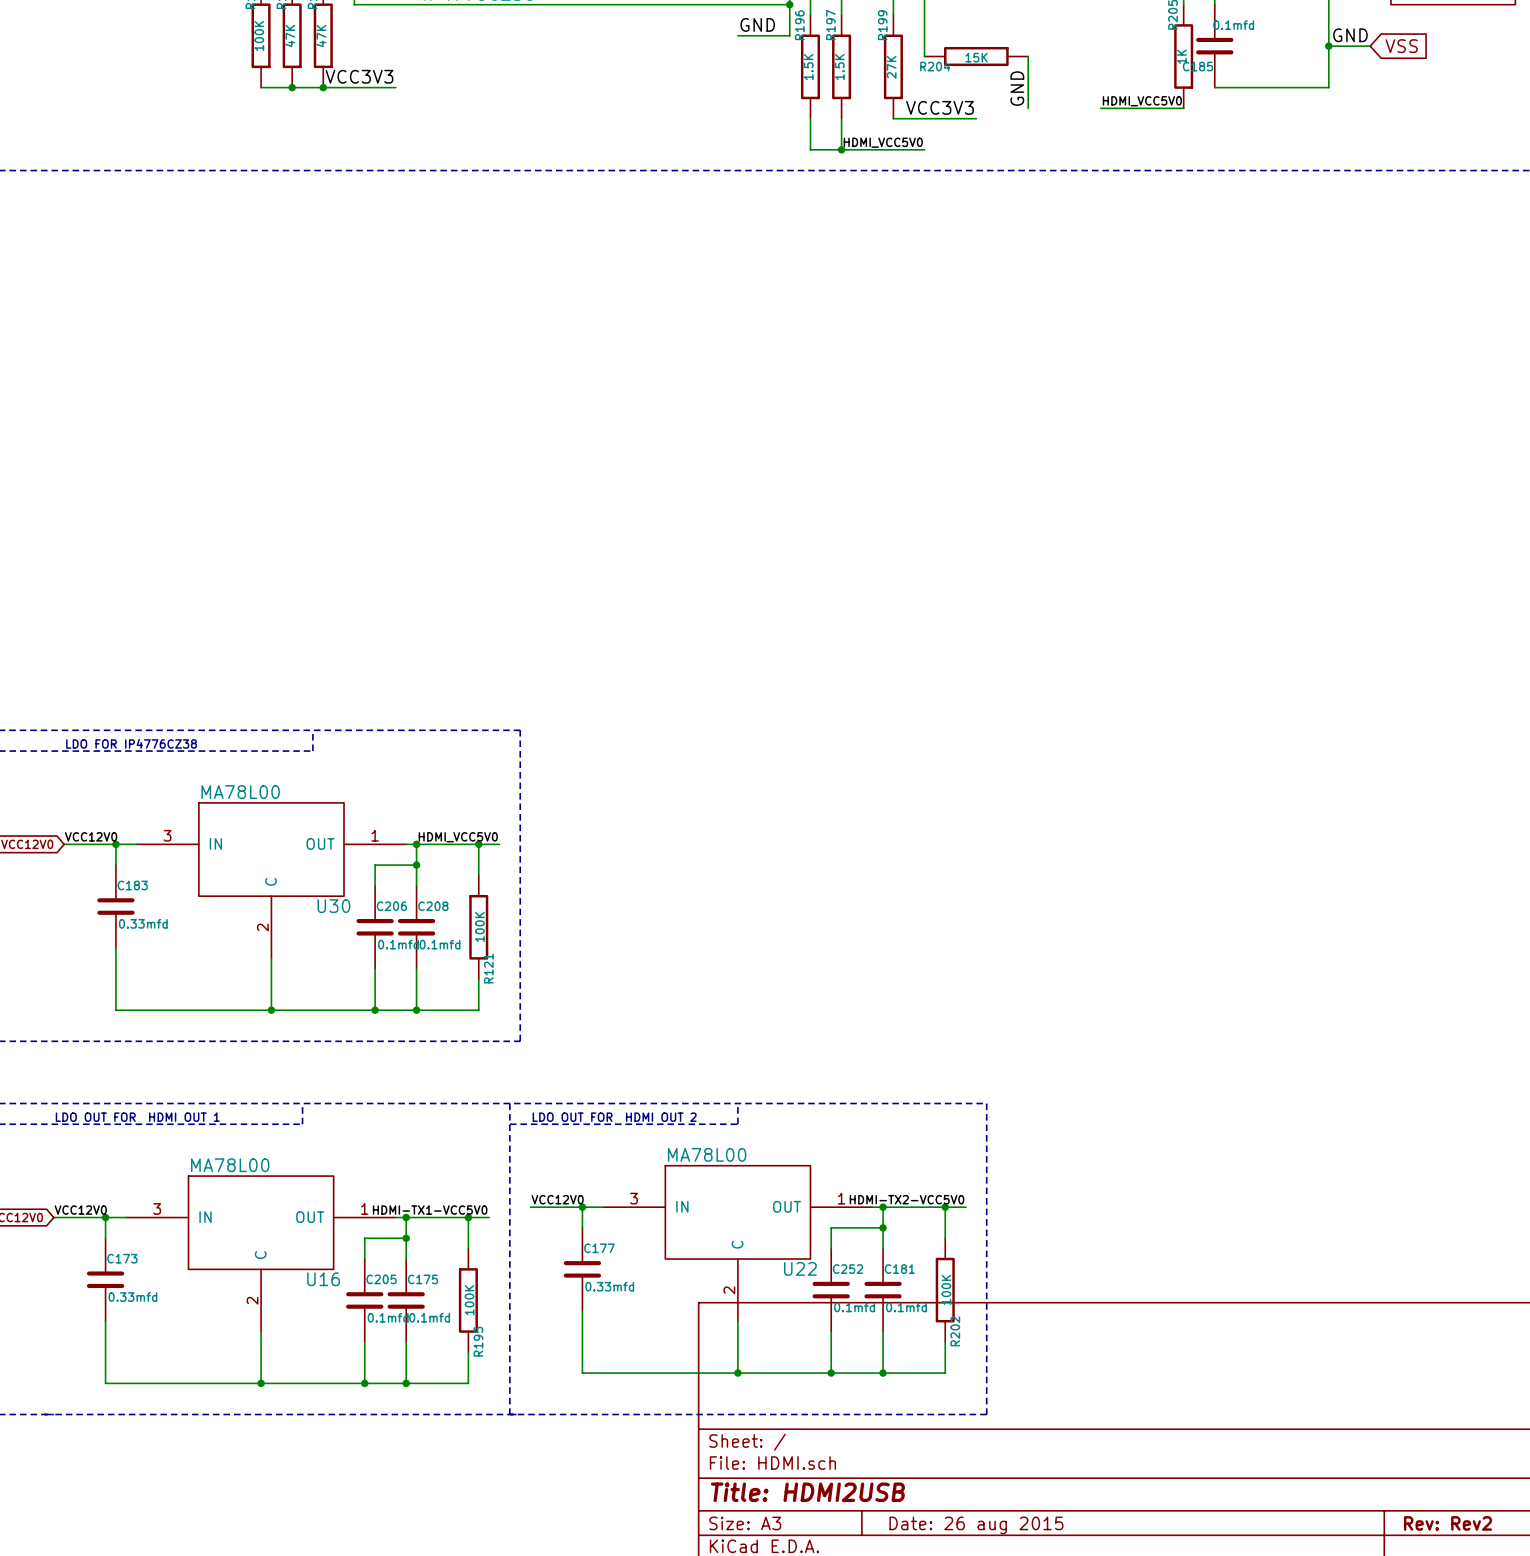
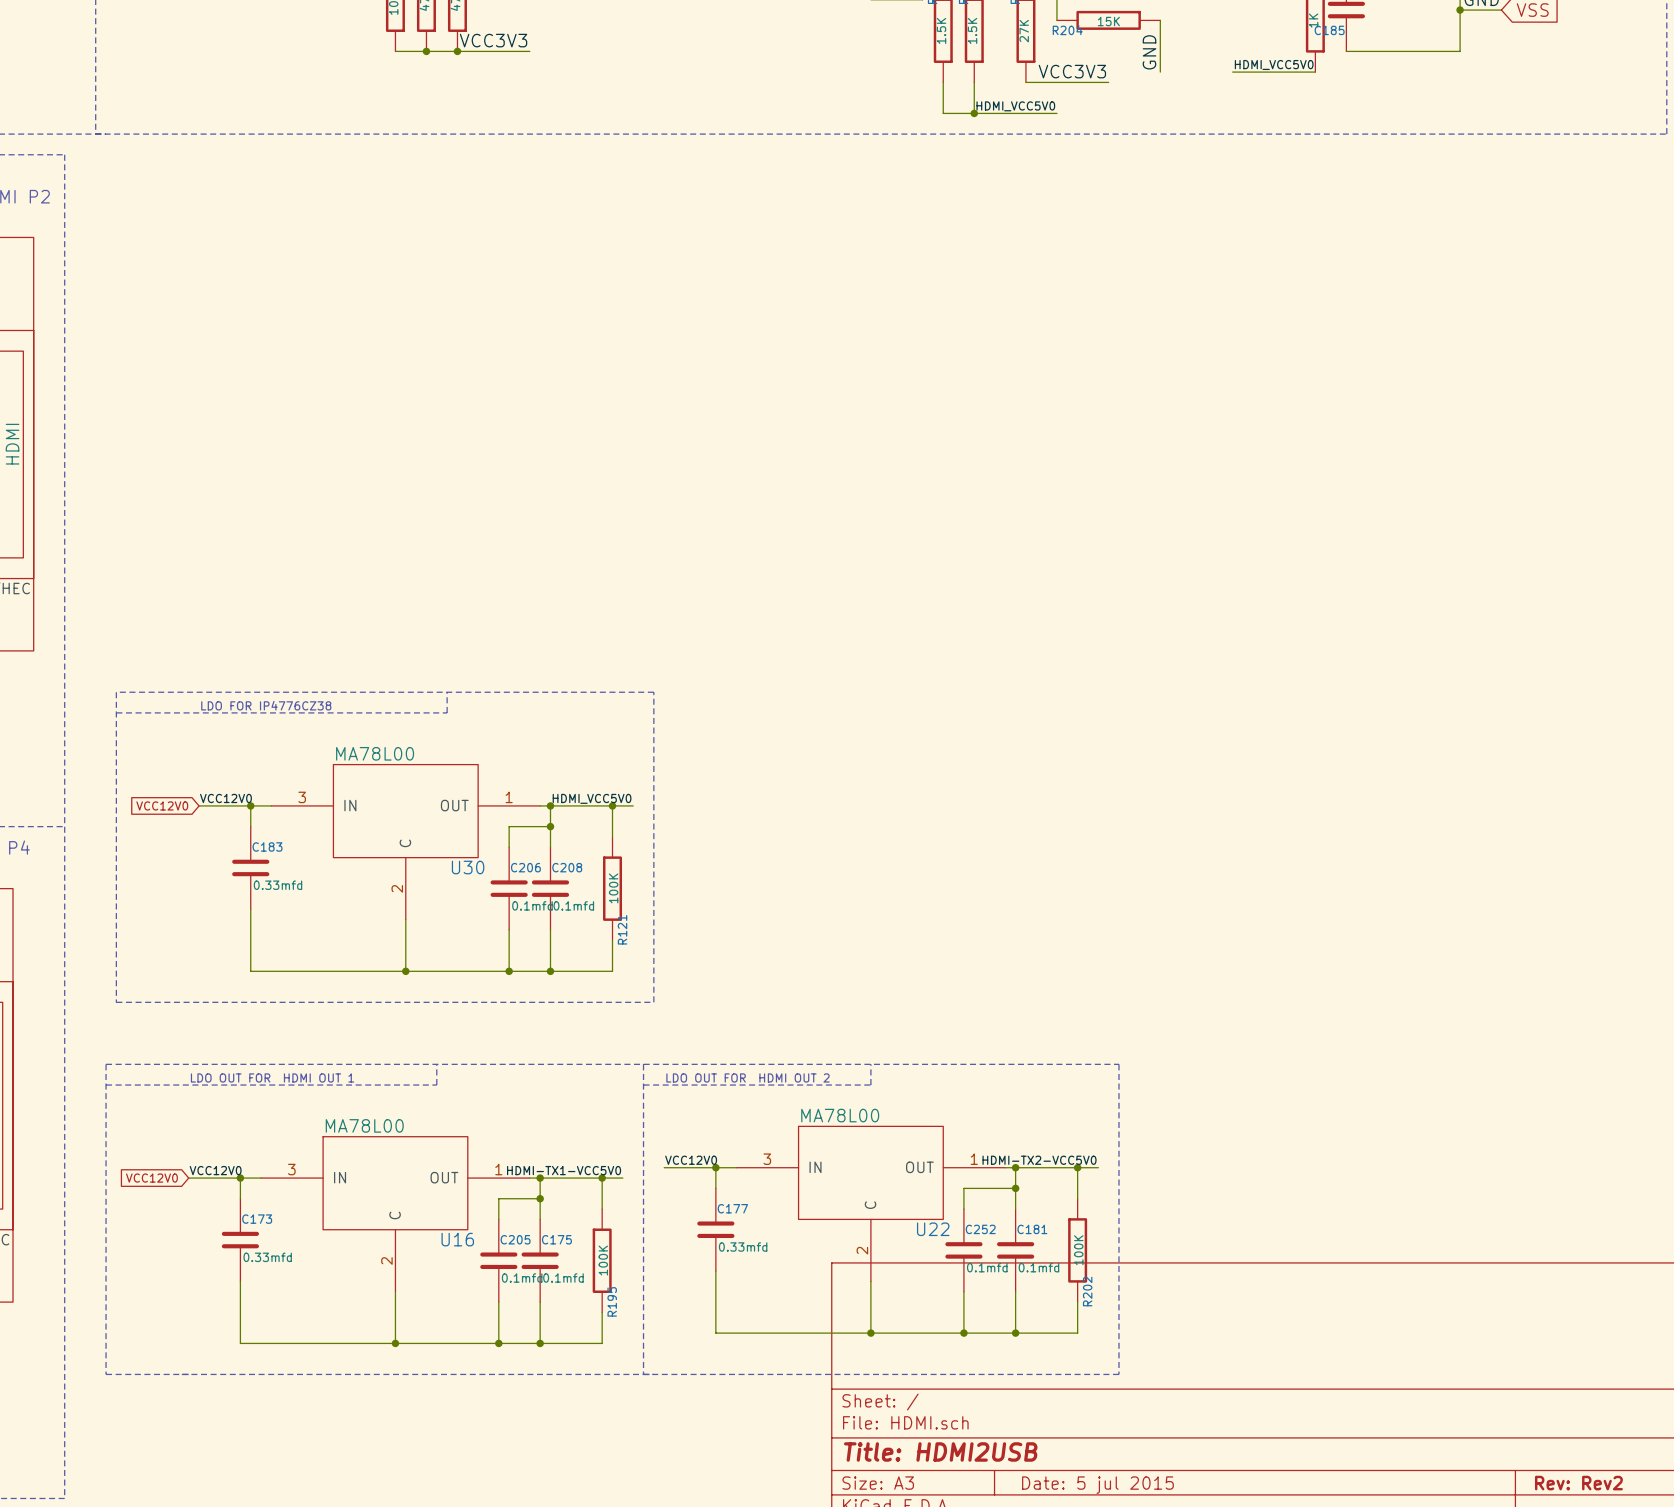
title block: Date: 26 aug 2015 (976, 1525) -> Date: 5 jul 2015 (1097, 1485)

